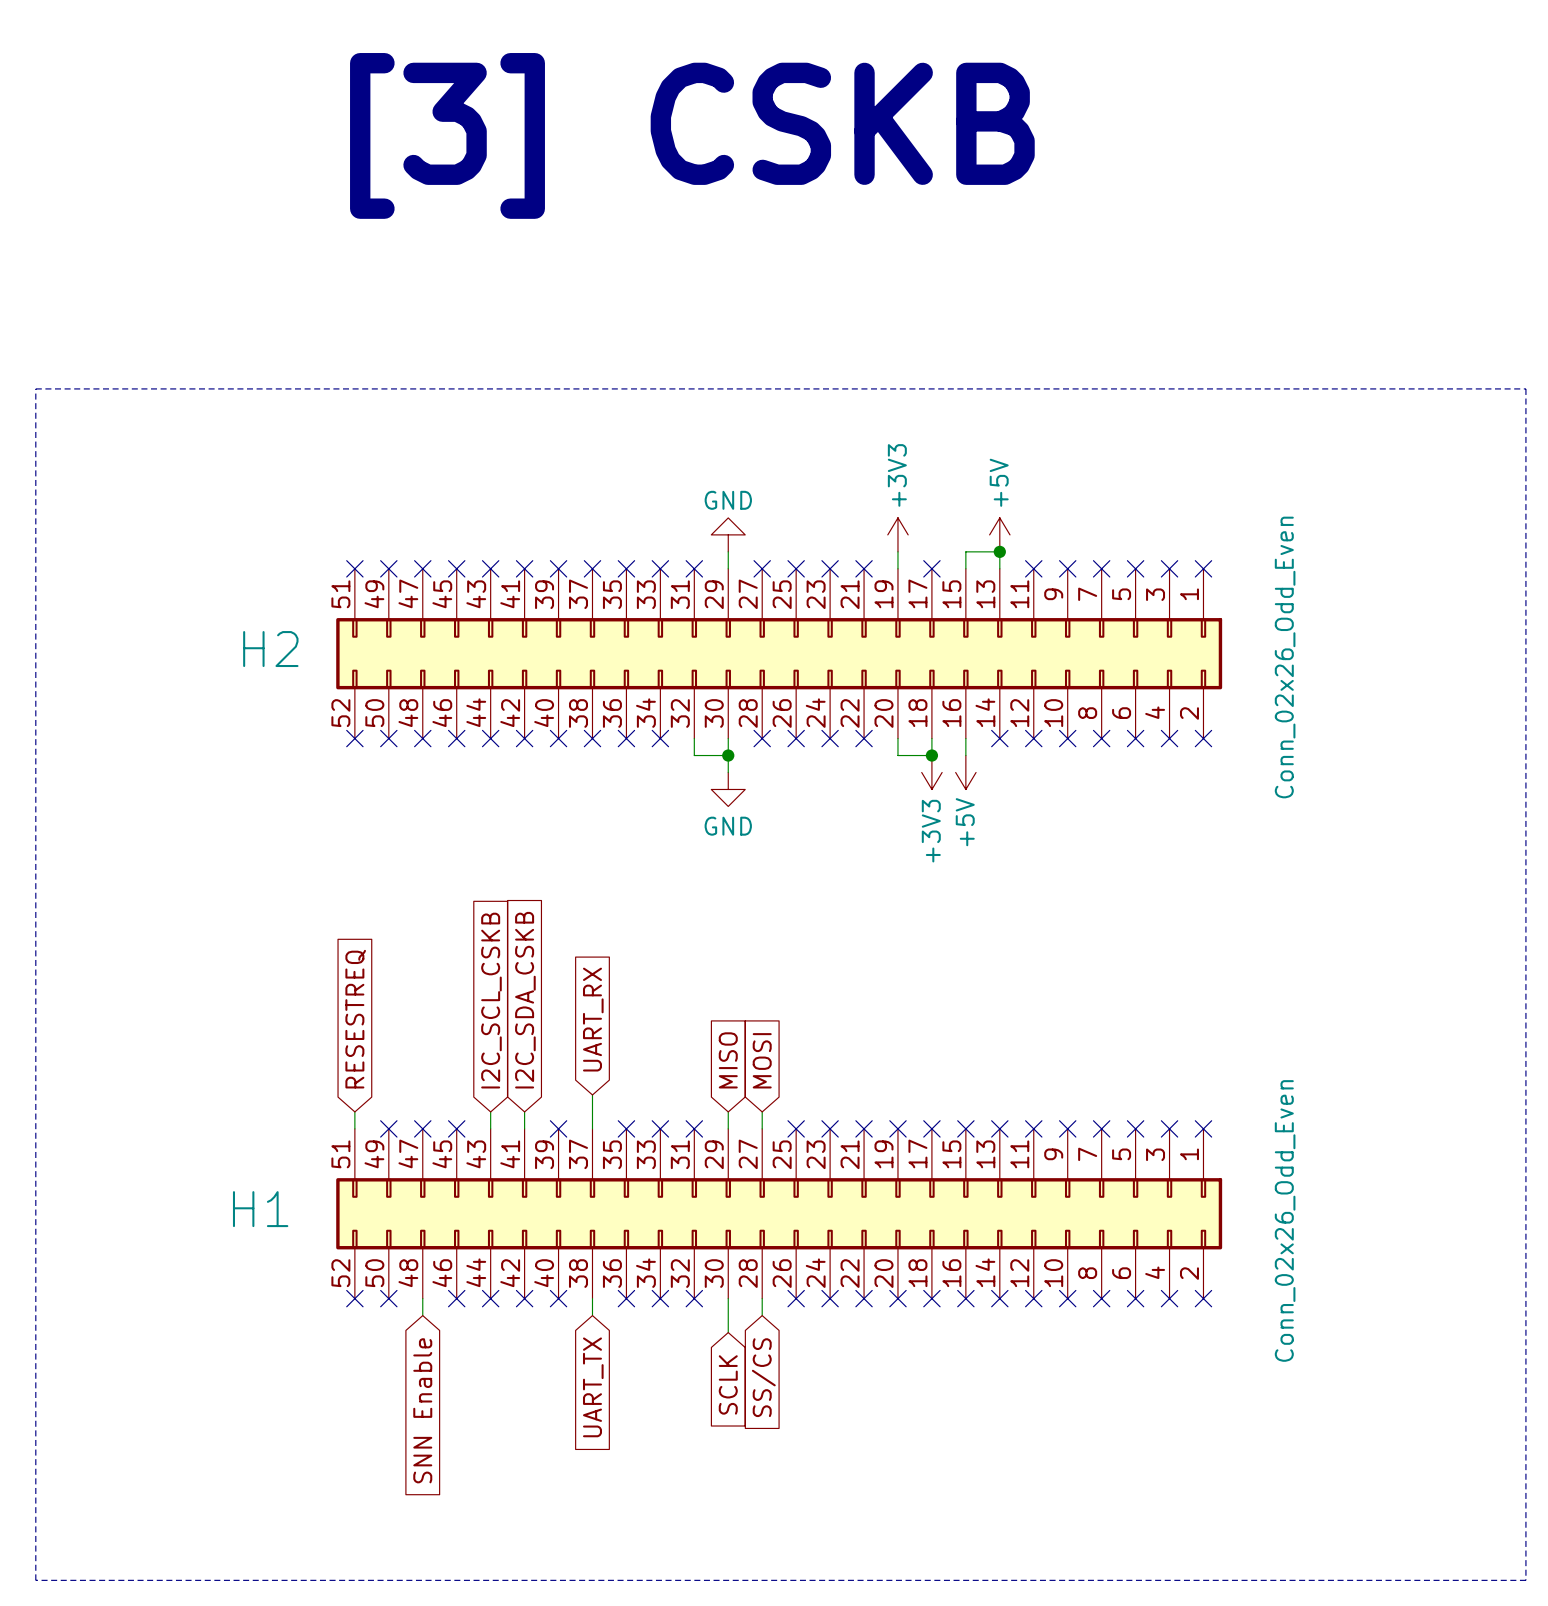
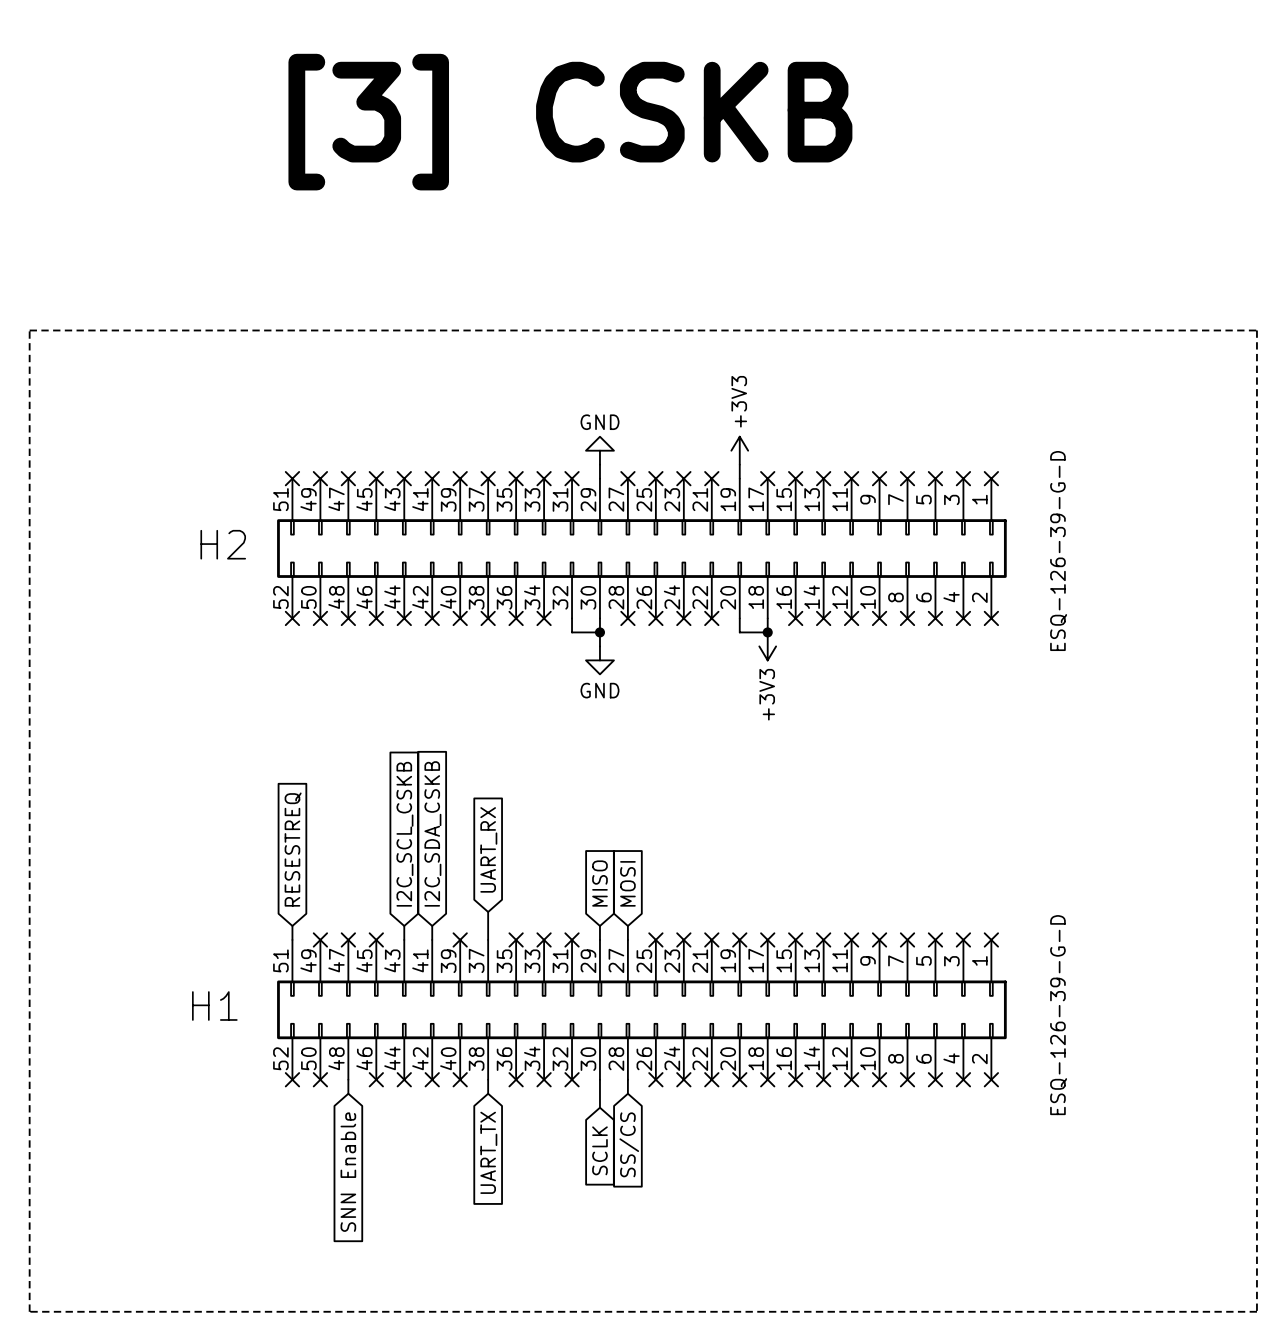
power symbol: +5V (999, 534) -> none
junction: (999, 551) -> none
wire: (965, 568) (965, 551) (999, 551) (999, 568) -> none
no-connect mark: none -> (795, 478)
no-connect mark: none -> (823, 478)
H2 value: Conn_02x26_Odd_Even (1285, 657) -> ESQ-126-39-G-D (1058, 551)
wire: (965, 738) (965, 755) -> none
no-connect mark: none -> (795, 618)
power symbol: +5V (965, 772) -> none
H1 value: Conn_02x26_Odd_Even (1285, 1220) -> ESQ-126-39-G-D (1058, 1015)

